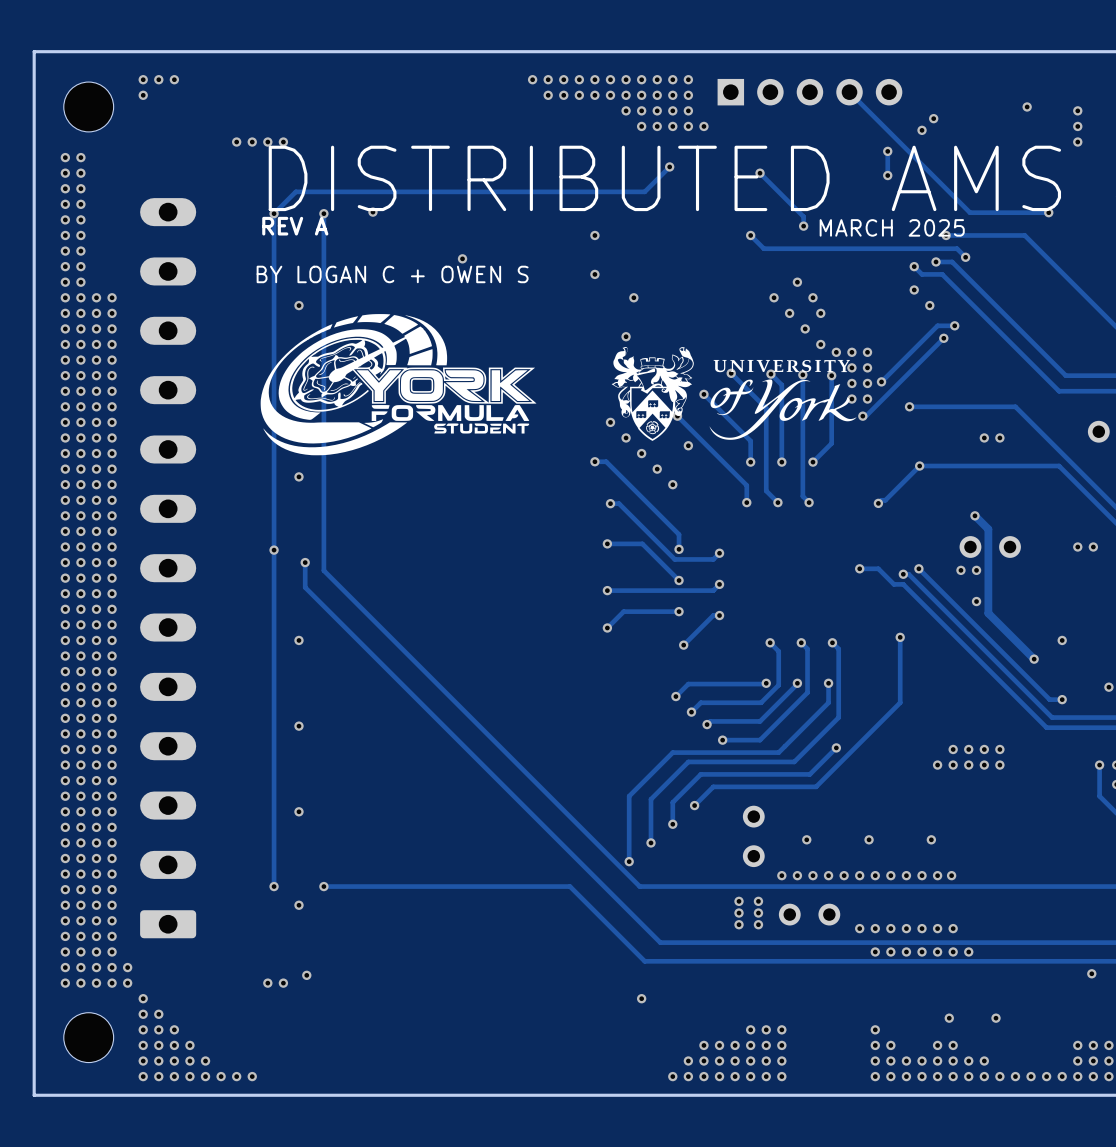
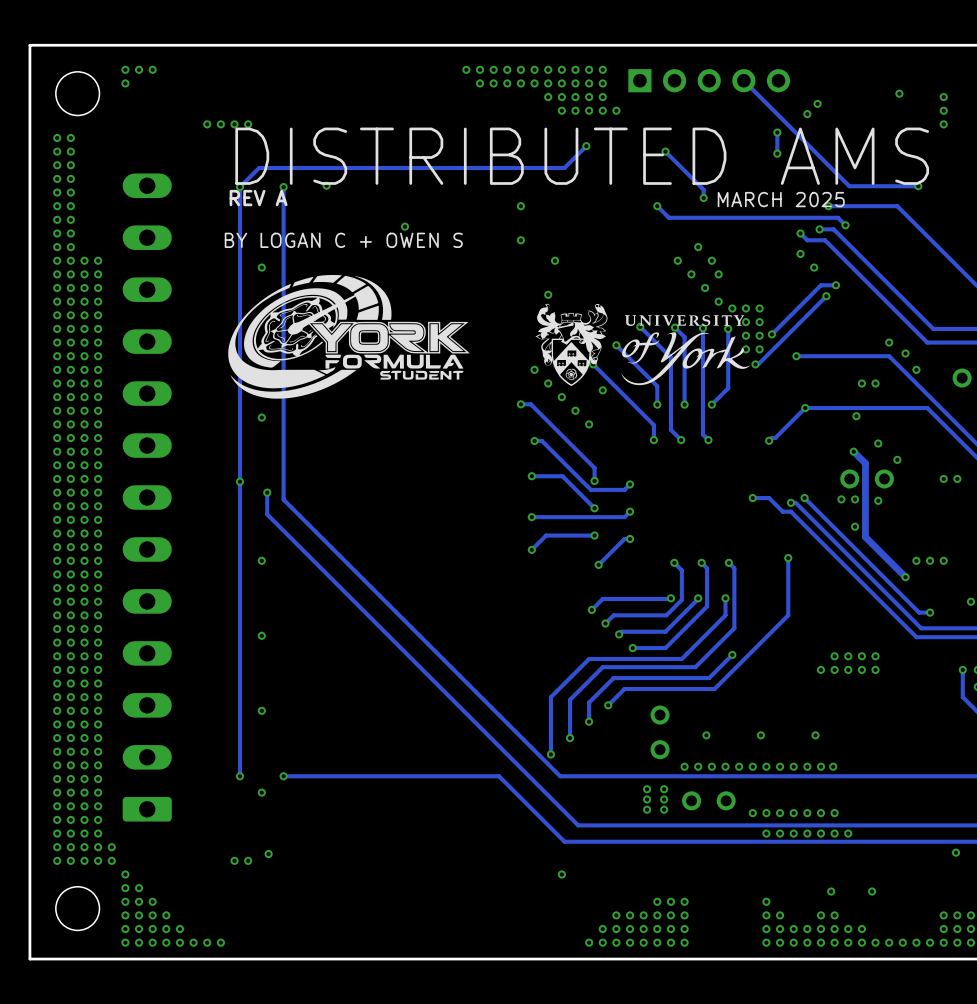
via: none -> (889, 342)
via: none -> (905, 353)
via: none -> (916, 369)
via: none -> (856, 416)
via: none -> (878, 443)
via: none -> (897, 459)
via: none -> (878, 500)
via: none -> (916, 560)
via: none -> (943, 560)

